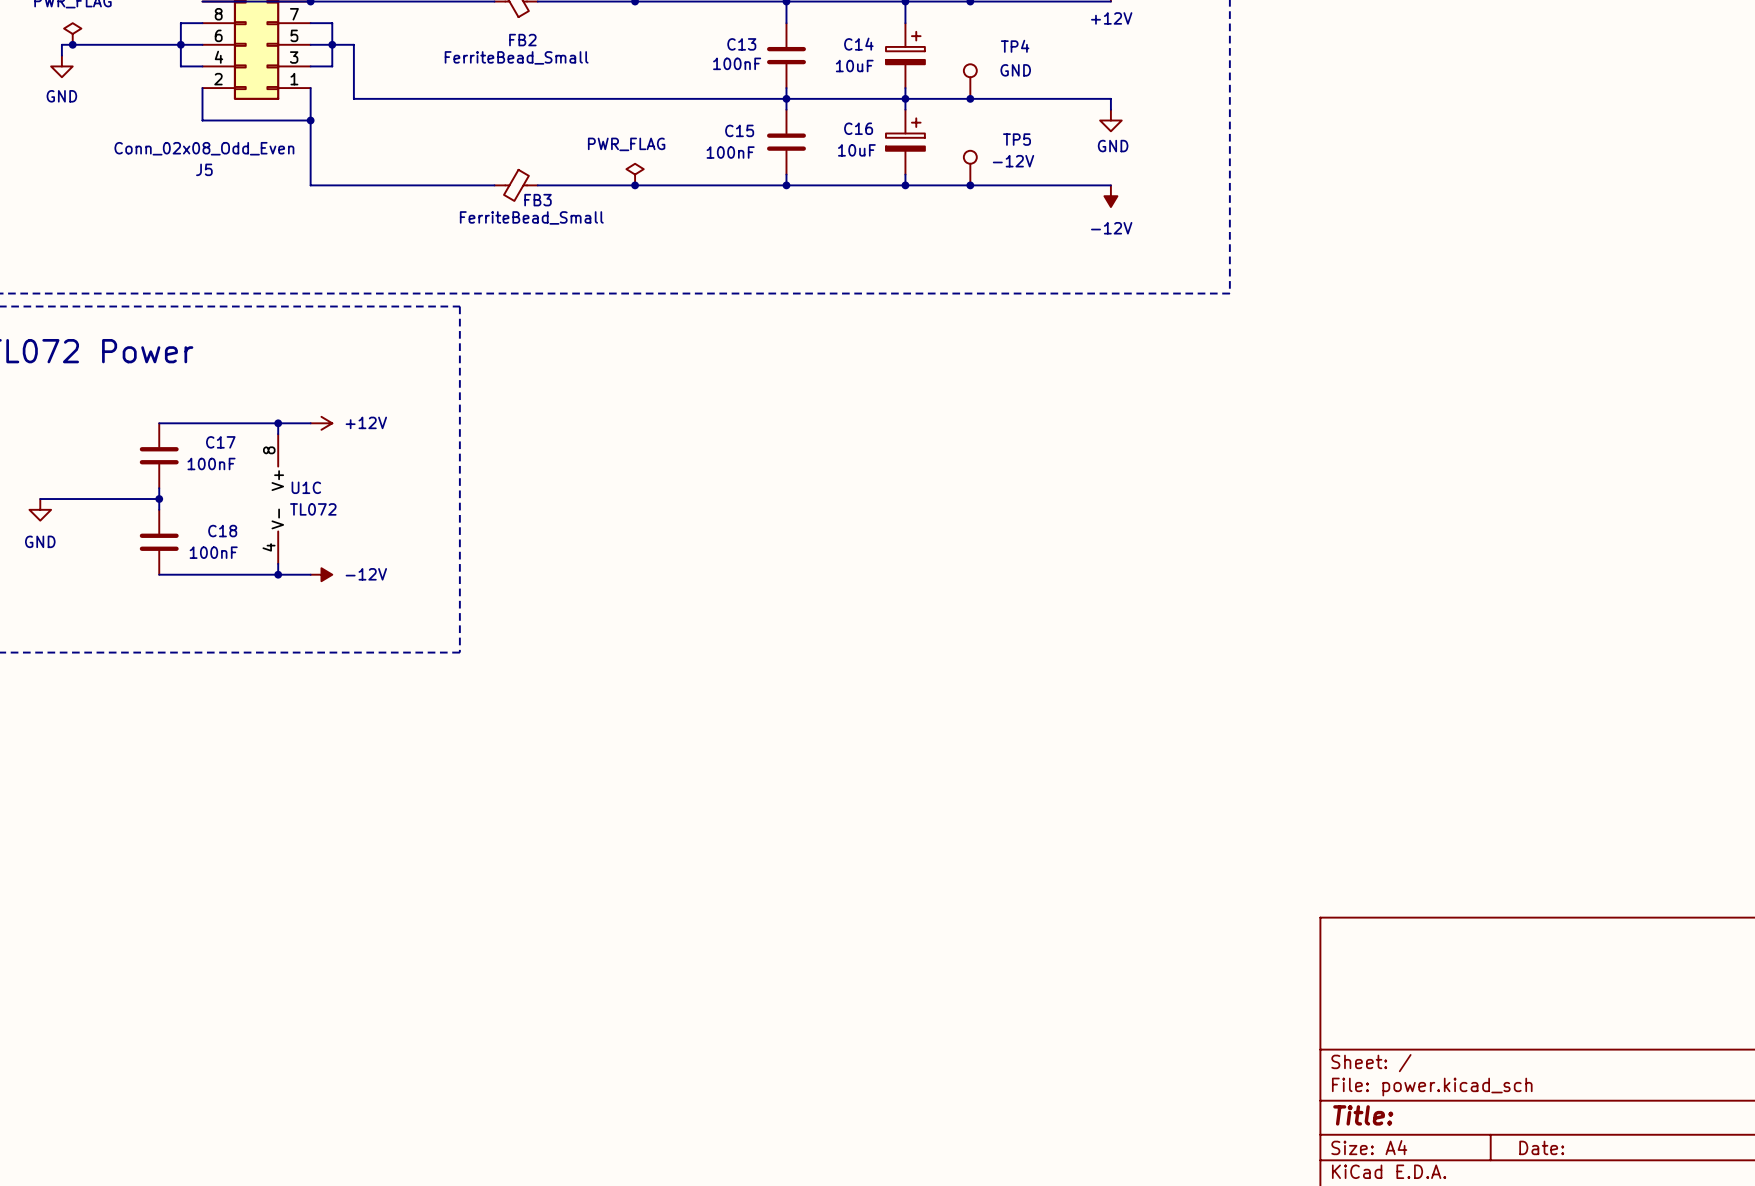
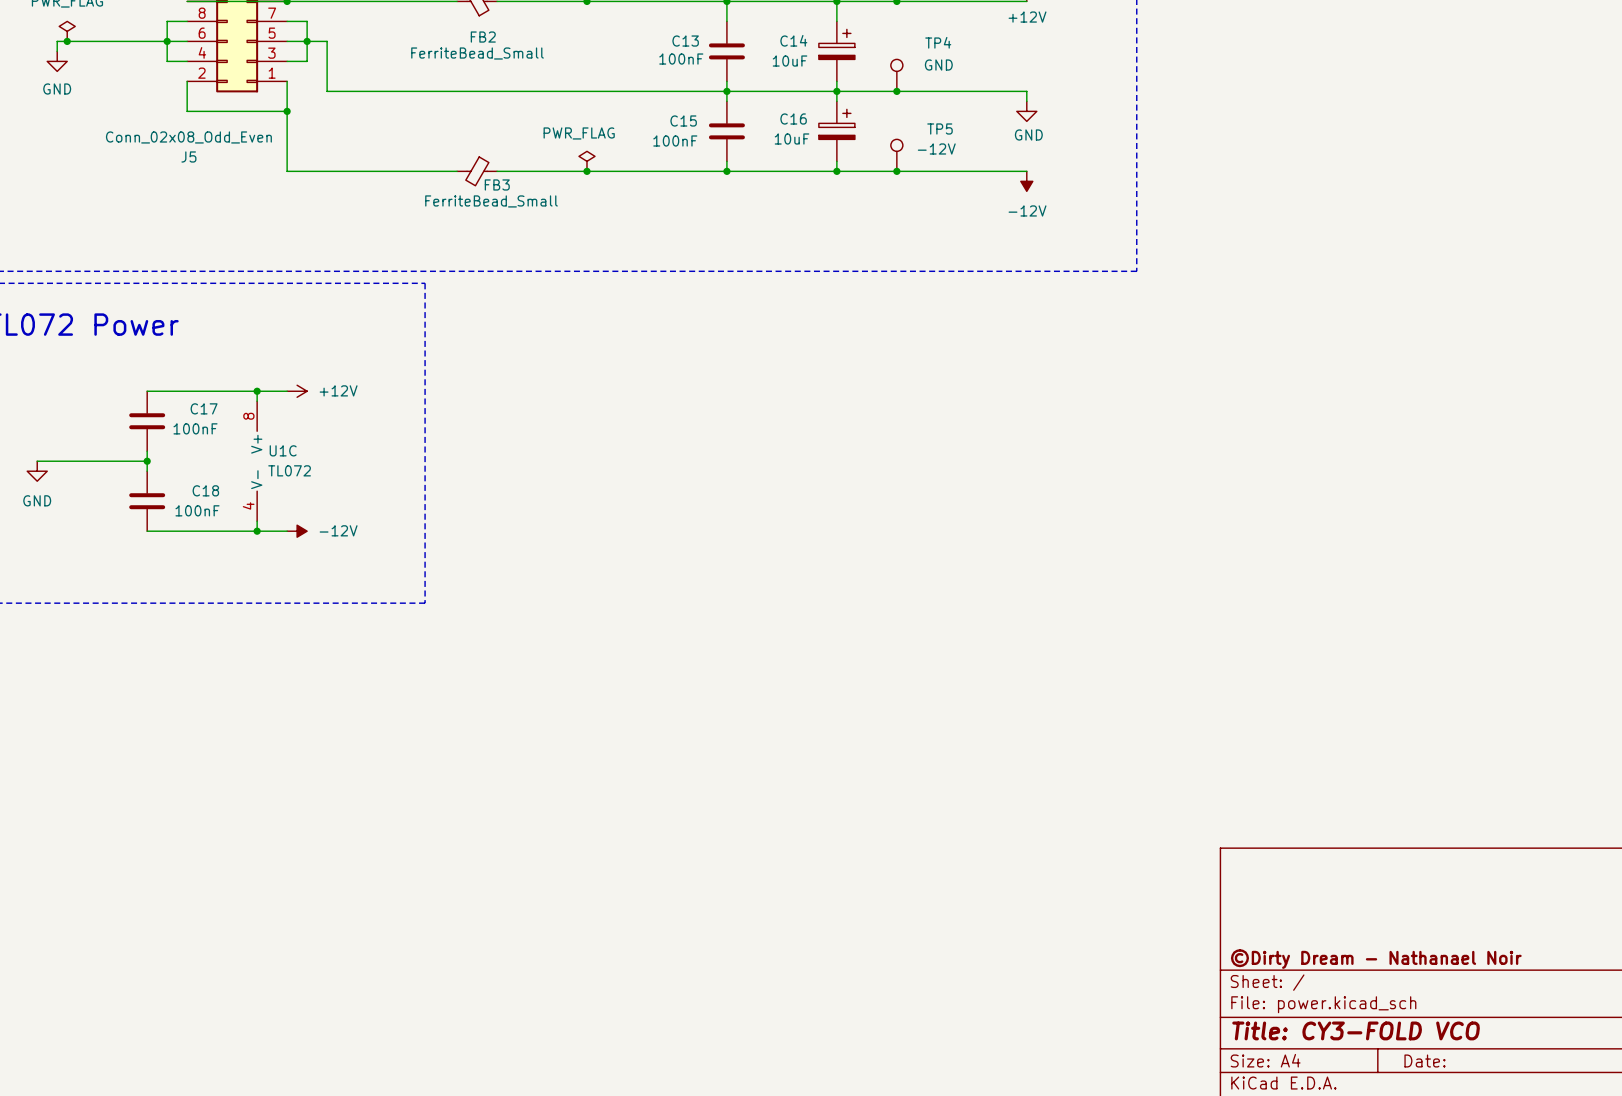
title block: none -> ©Dirty Dream - Nathanael Noir (1376, 959)
title block: Title: (1363, 1115) -> Title: CY3-FOLD VCO (1356, 1030)

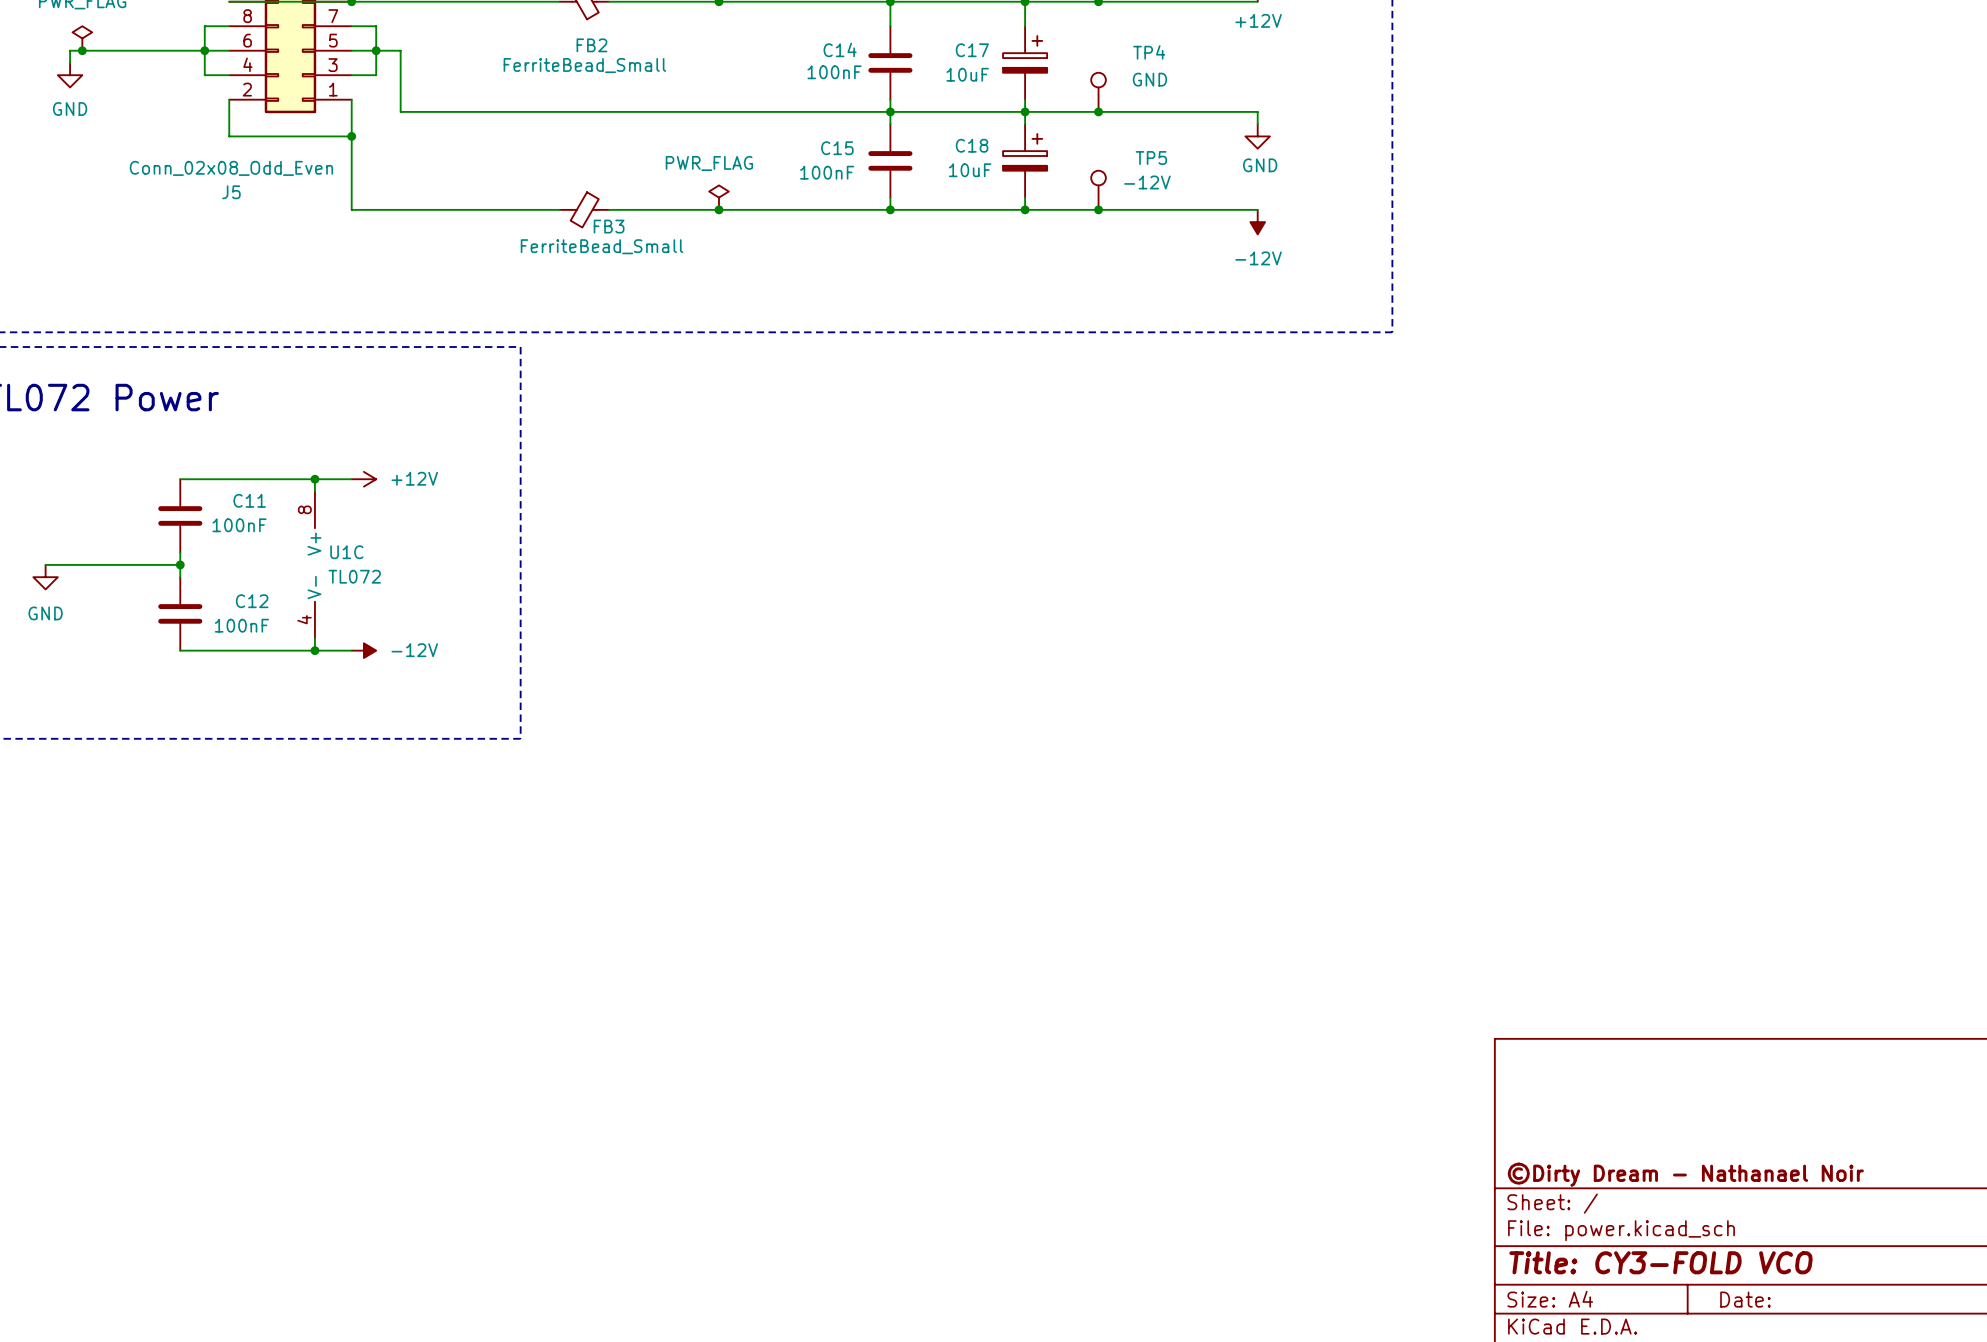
C14 name: C14 (793, 40) -> C17 (972, 50)
C13 name: C13 (685, 41) -> C14 (840, 49)
C16 name: C16 (793, 119) -> C18 (972, 145)
C17 name: C17 (204, 408) -> C11 (249, 500)
C18 name: C18 (205, 490) -> C12 (252, 601)

